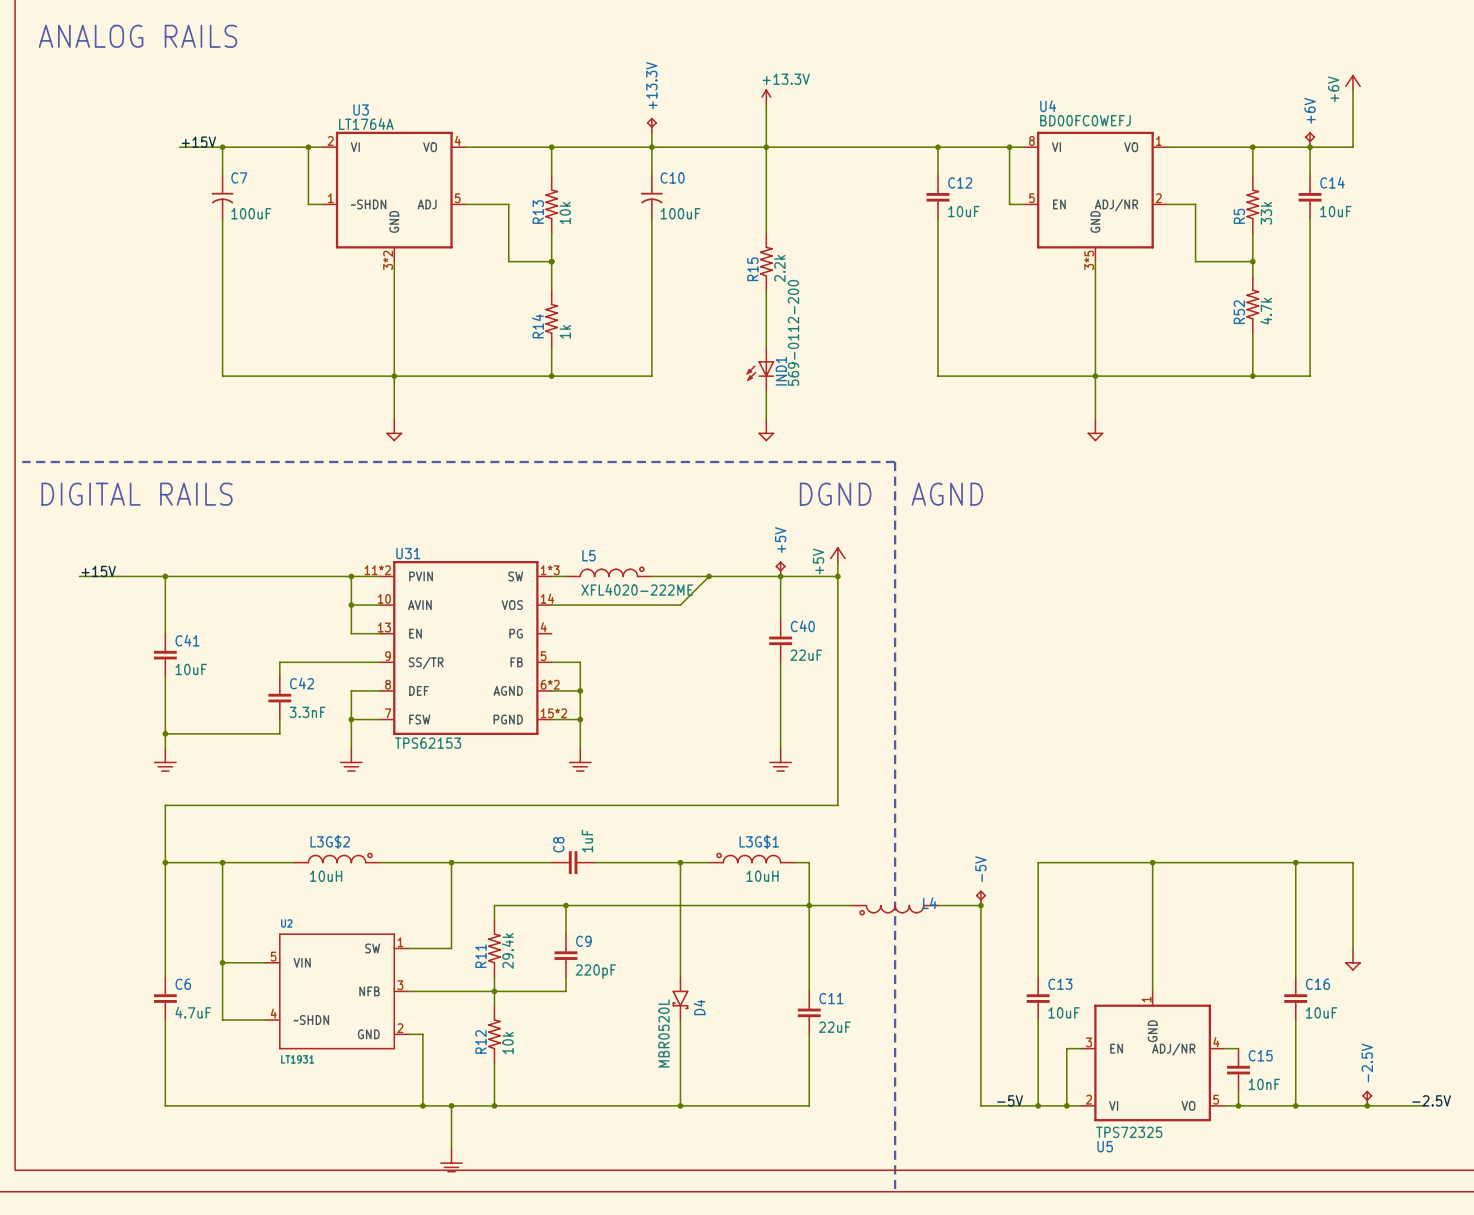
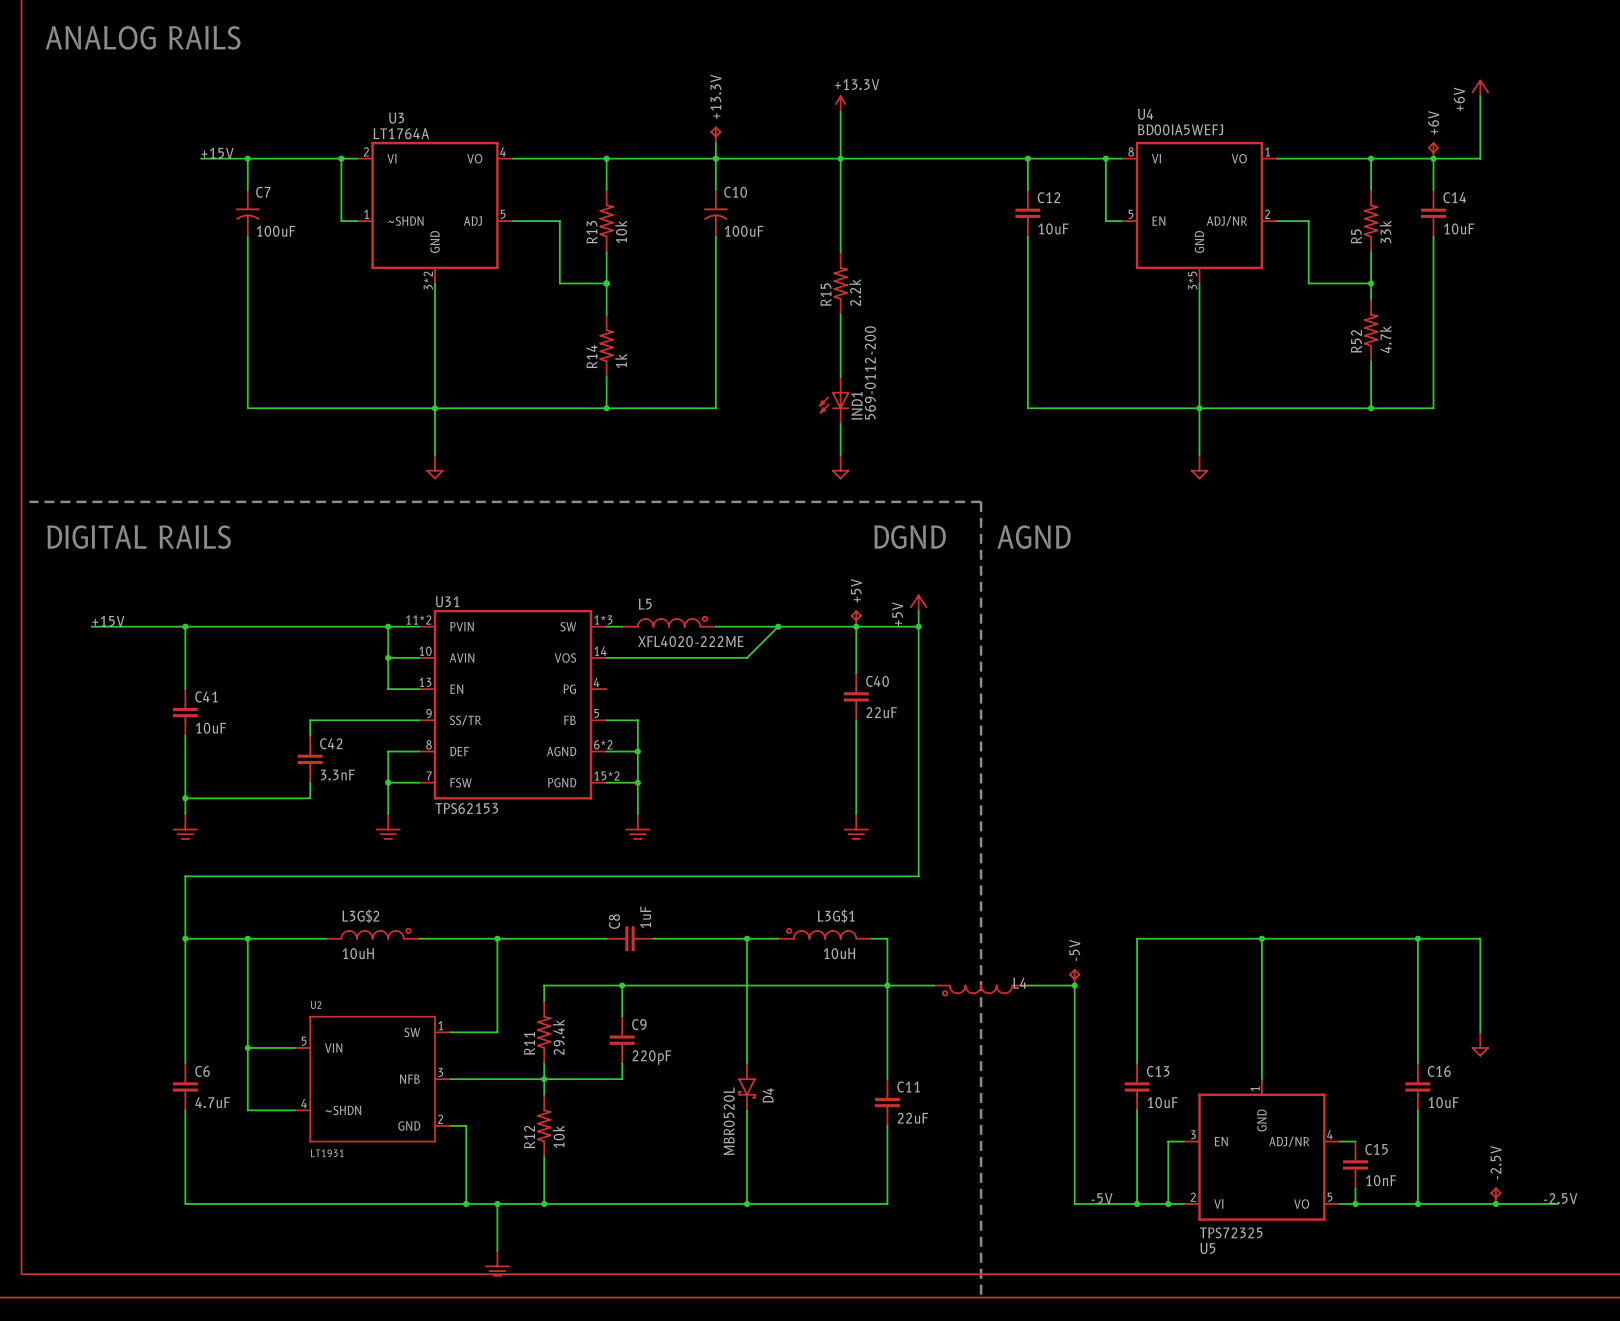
U4 value: BD00FC0WEFJ (1085, 120) -> BD00IA5WEFJ (1180, 129)

